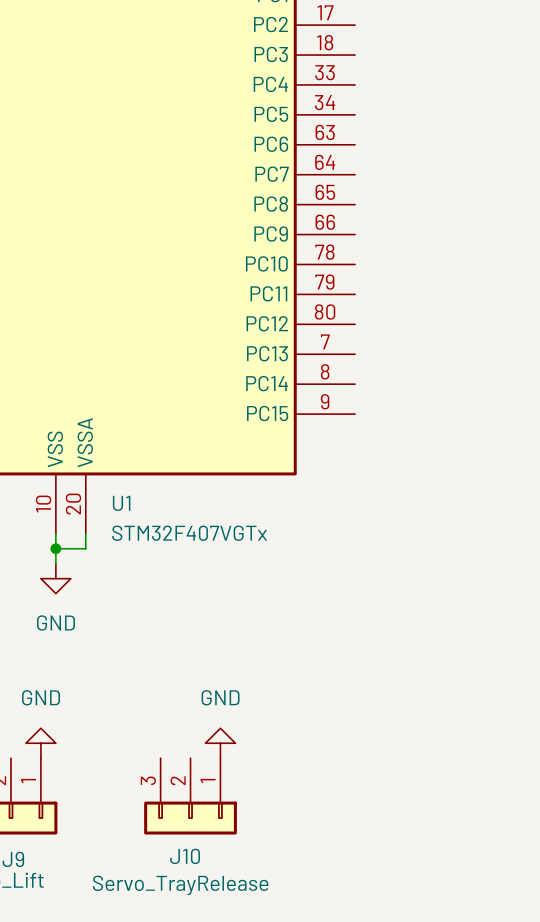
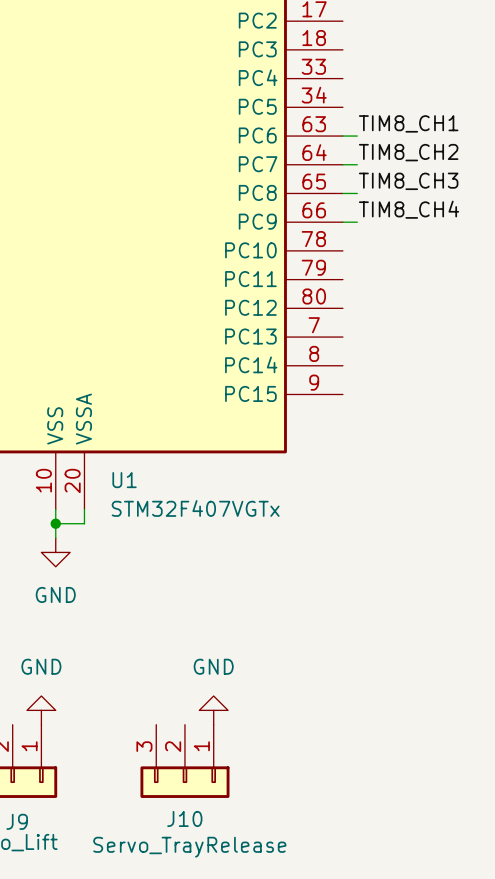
label: none -> TIM8_CH1 (408, 123)
wire: none -> (342, 136) (357, 136)
label: none -> TIM8_CH2 (408, 152)
wire: none -> (342, 164) (357, 164)
label: none -> TIM8_CH3 (408, 181)
wire: none -> (342, 193) (357, 193)
label: none -> TIM8_CH4 (409, 209)
wire: none -> (342, 222) (357, 222)

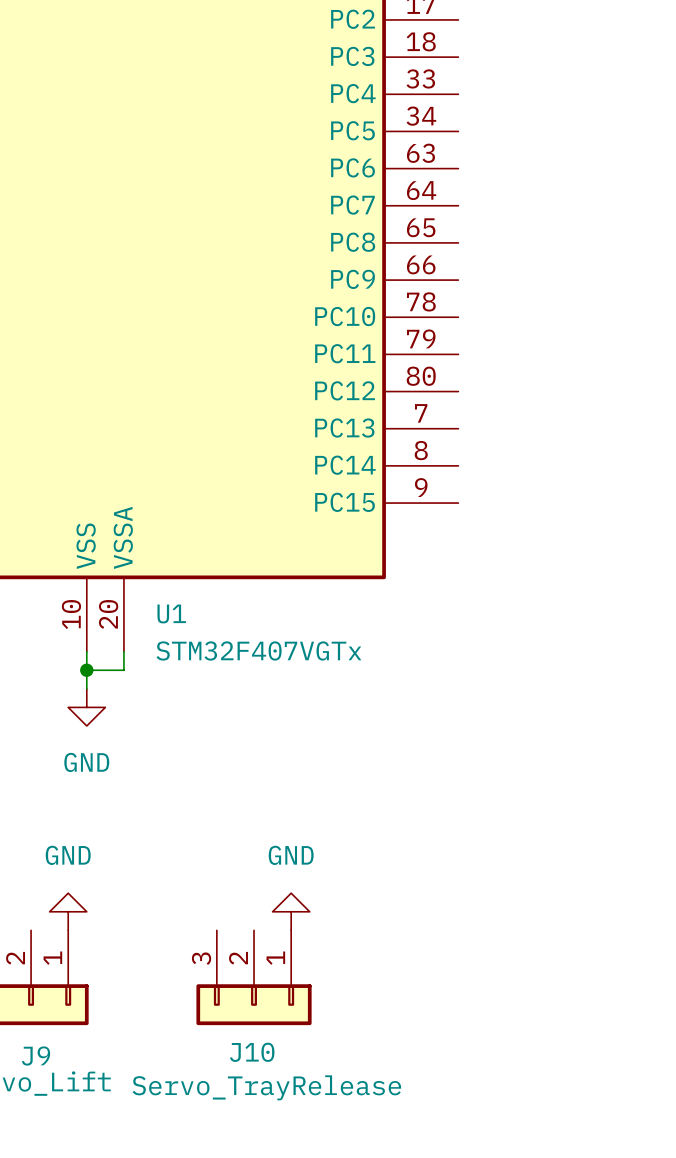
label: TIM8_CH1 (408, 123) -> none
wire: (342, 136) (357, 136) -> none
label: TIM8_CH2 (408, 152) -> none
wire: (342, 164) (357, 164) -> none
label: TIM8_CH3 (408, 181) -> none
wire: (342, 193) (357, 193) -> none
label: TIM8_CH4 (409, 209) -> none
wire: (342, 222) (357, 222) -> none

